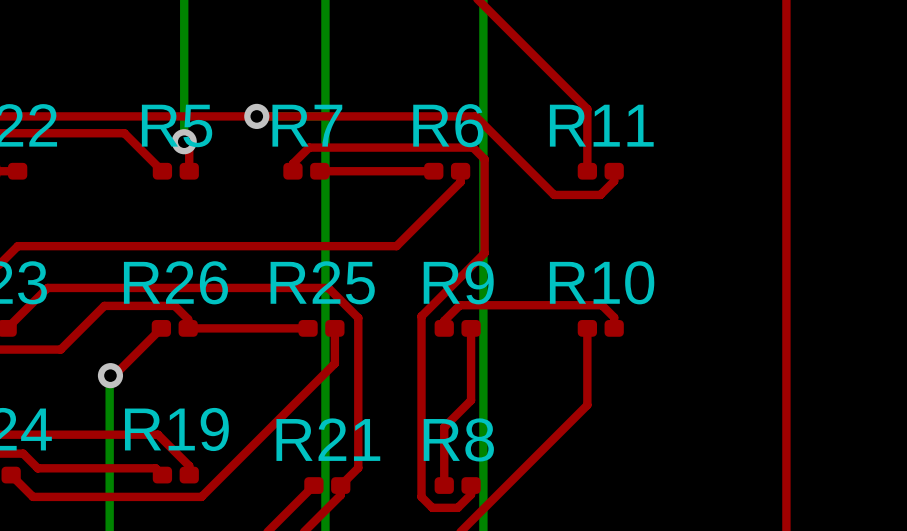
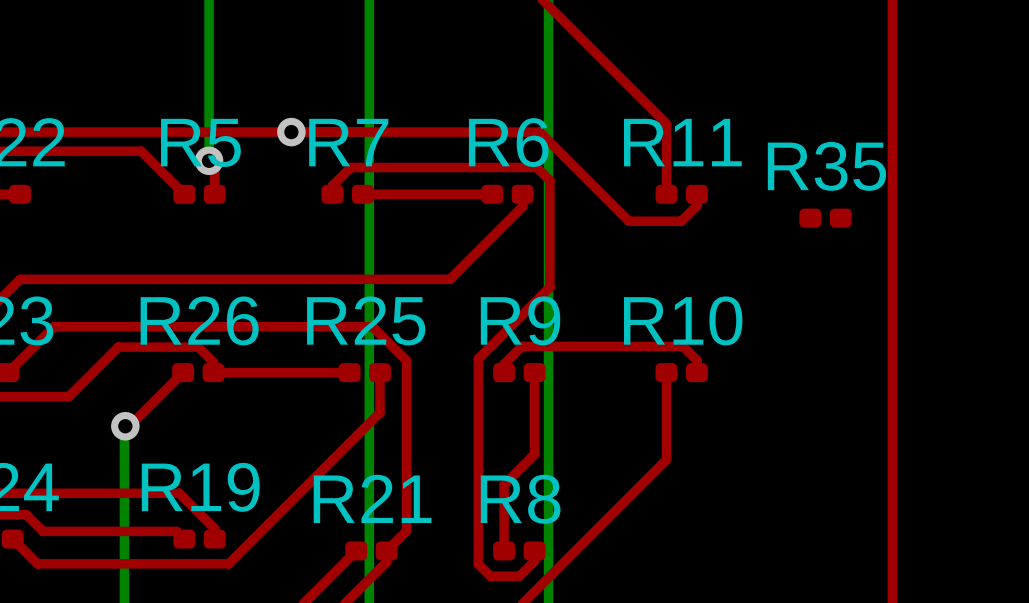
R35: none -> (825, 218)

